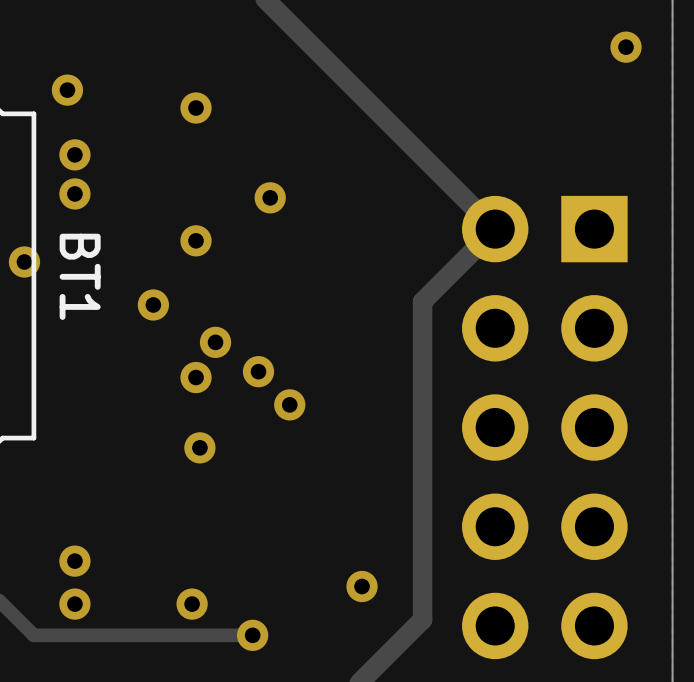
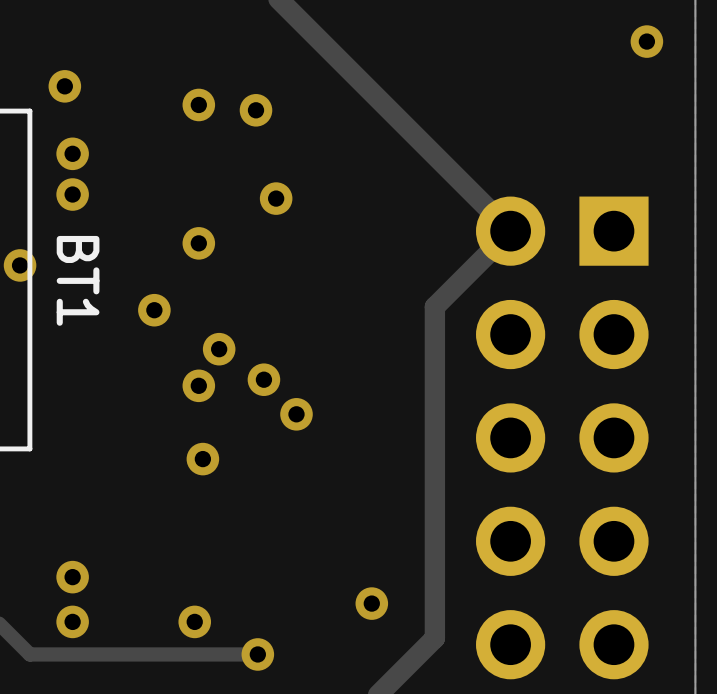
via: none -> (256, 110)

